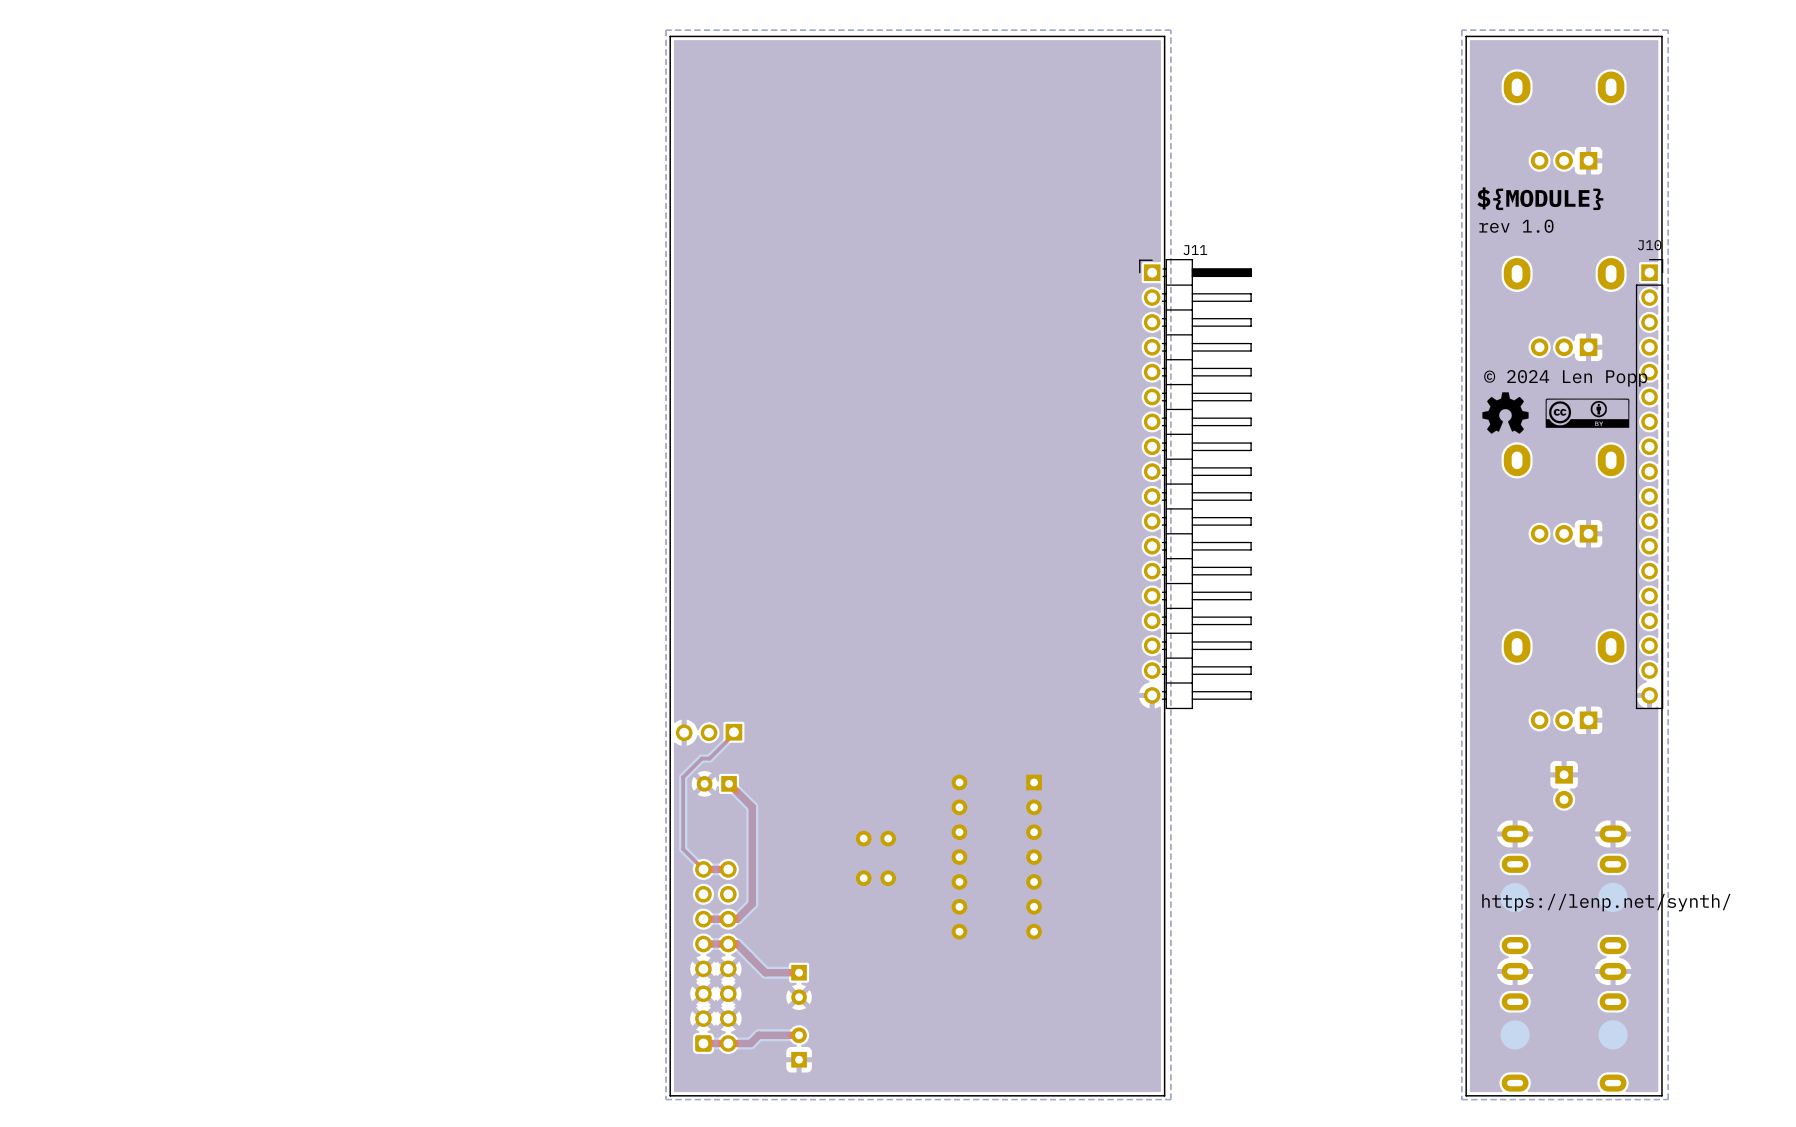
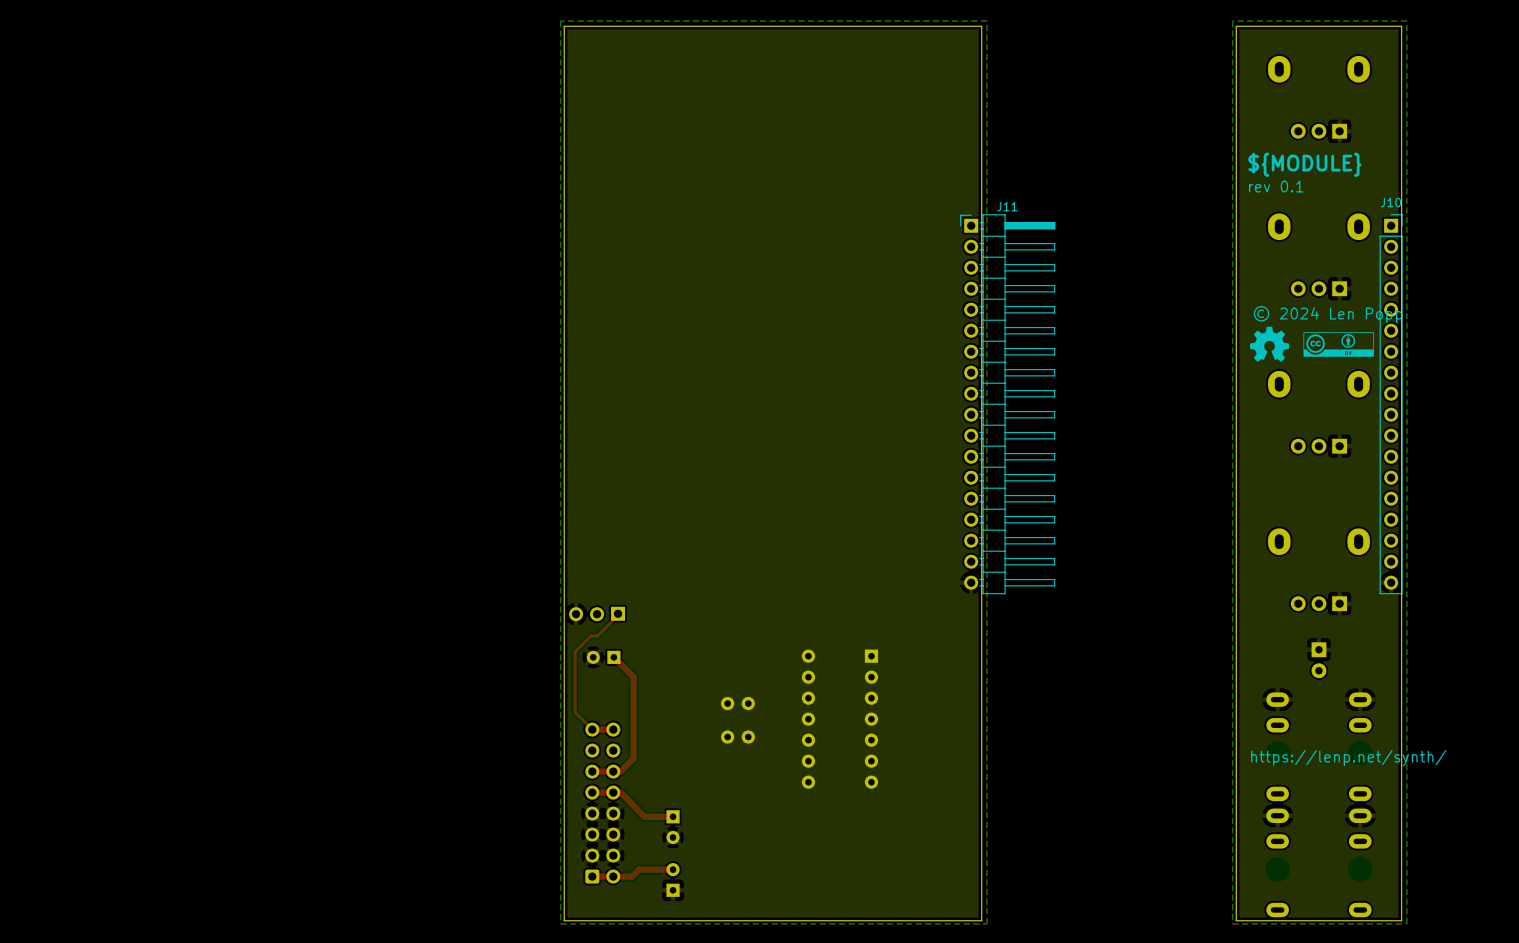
text: rev 1.0 (1516, 226) -> rev 0.1 (1276, 186)

